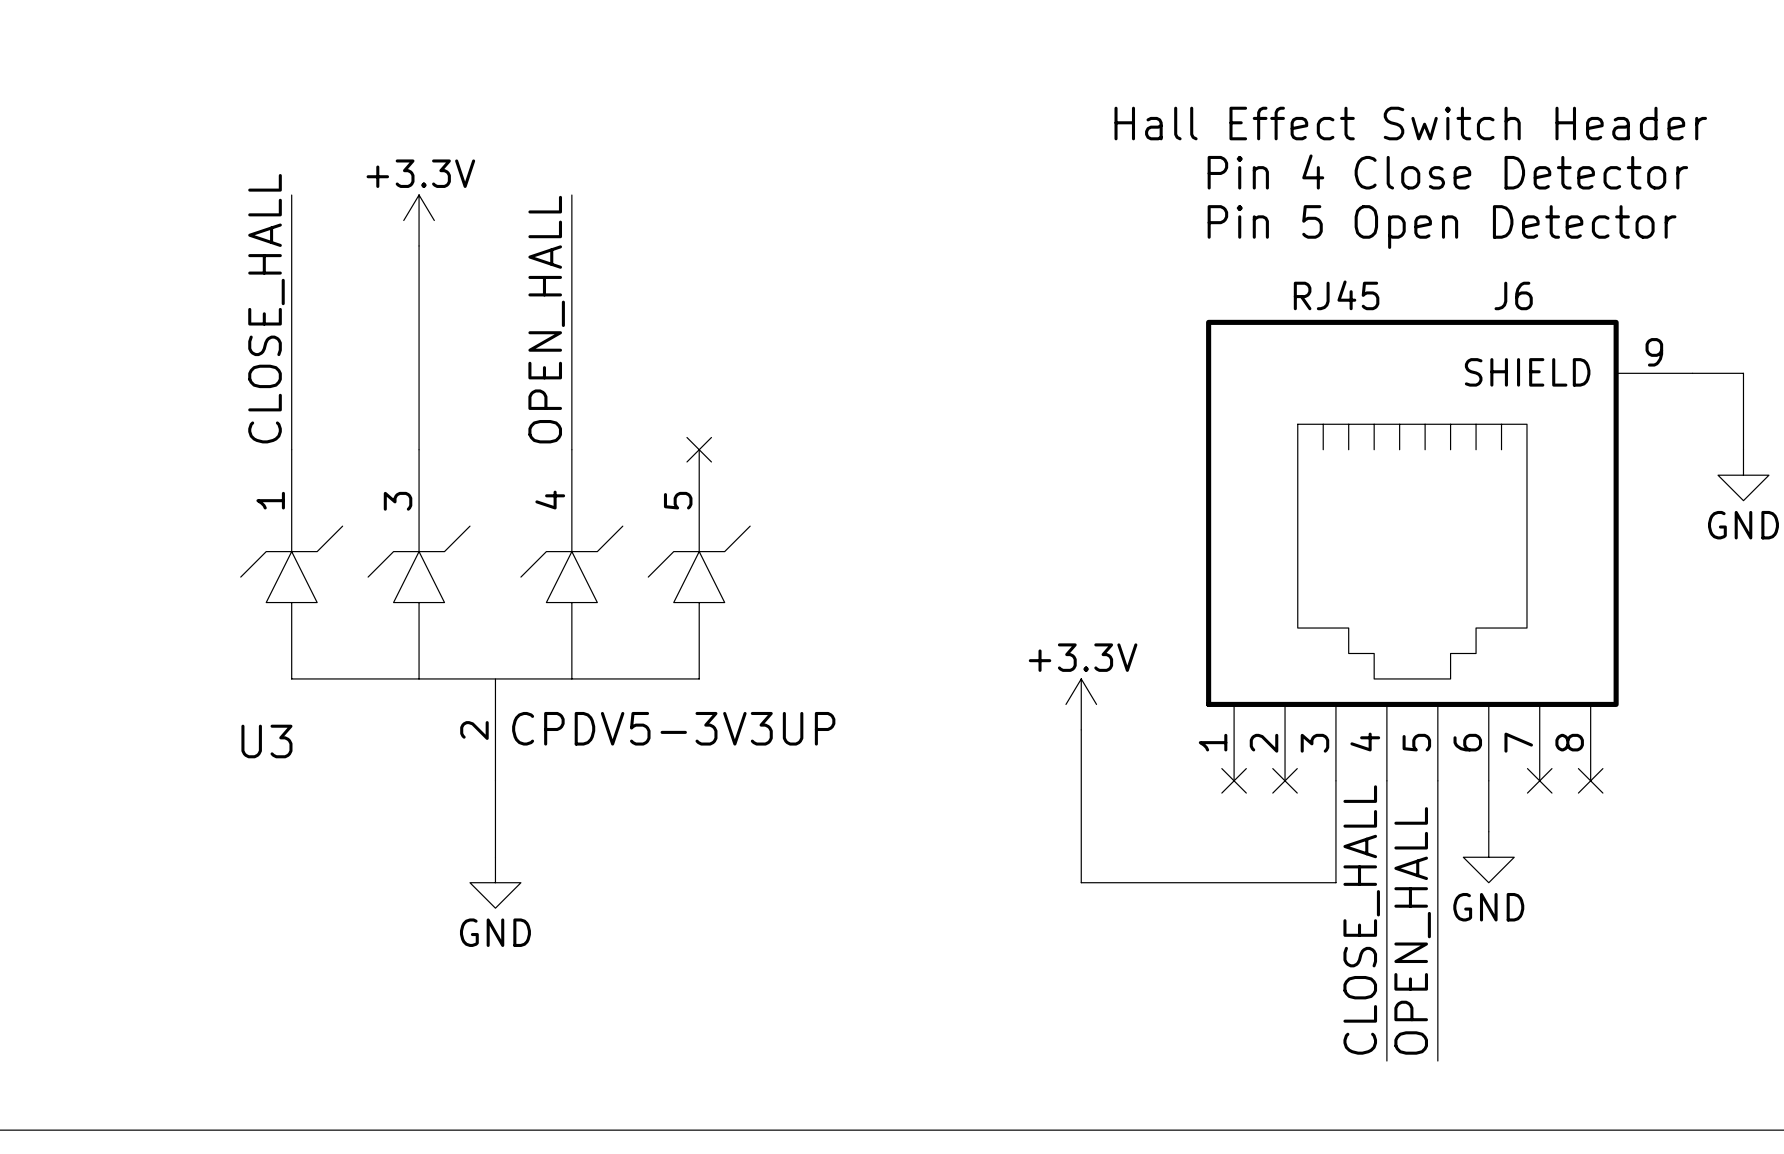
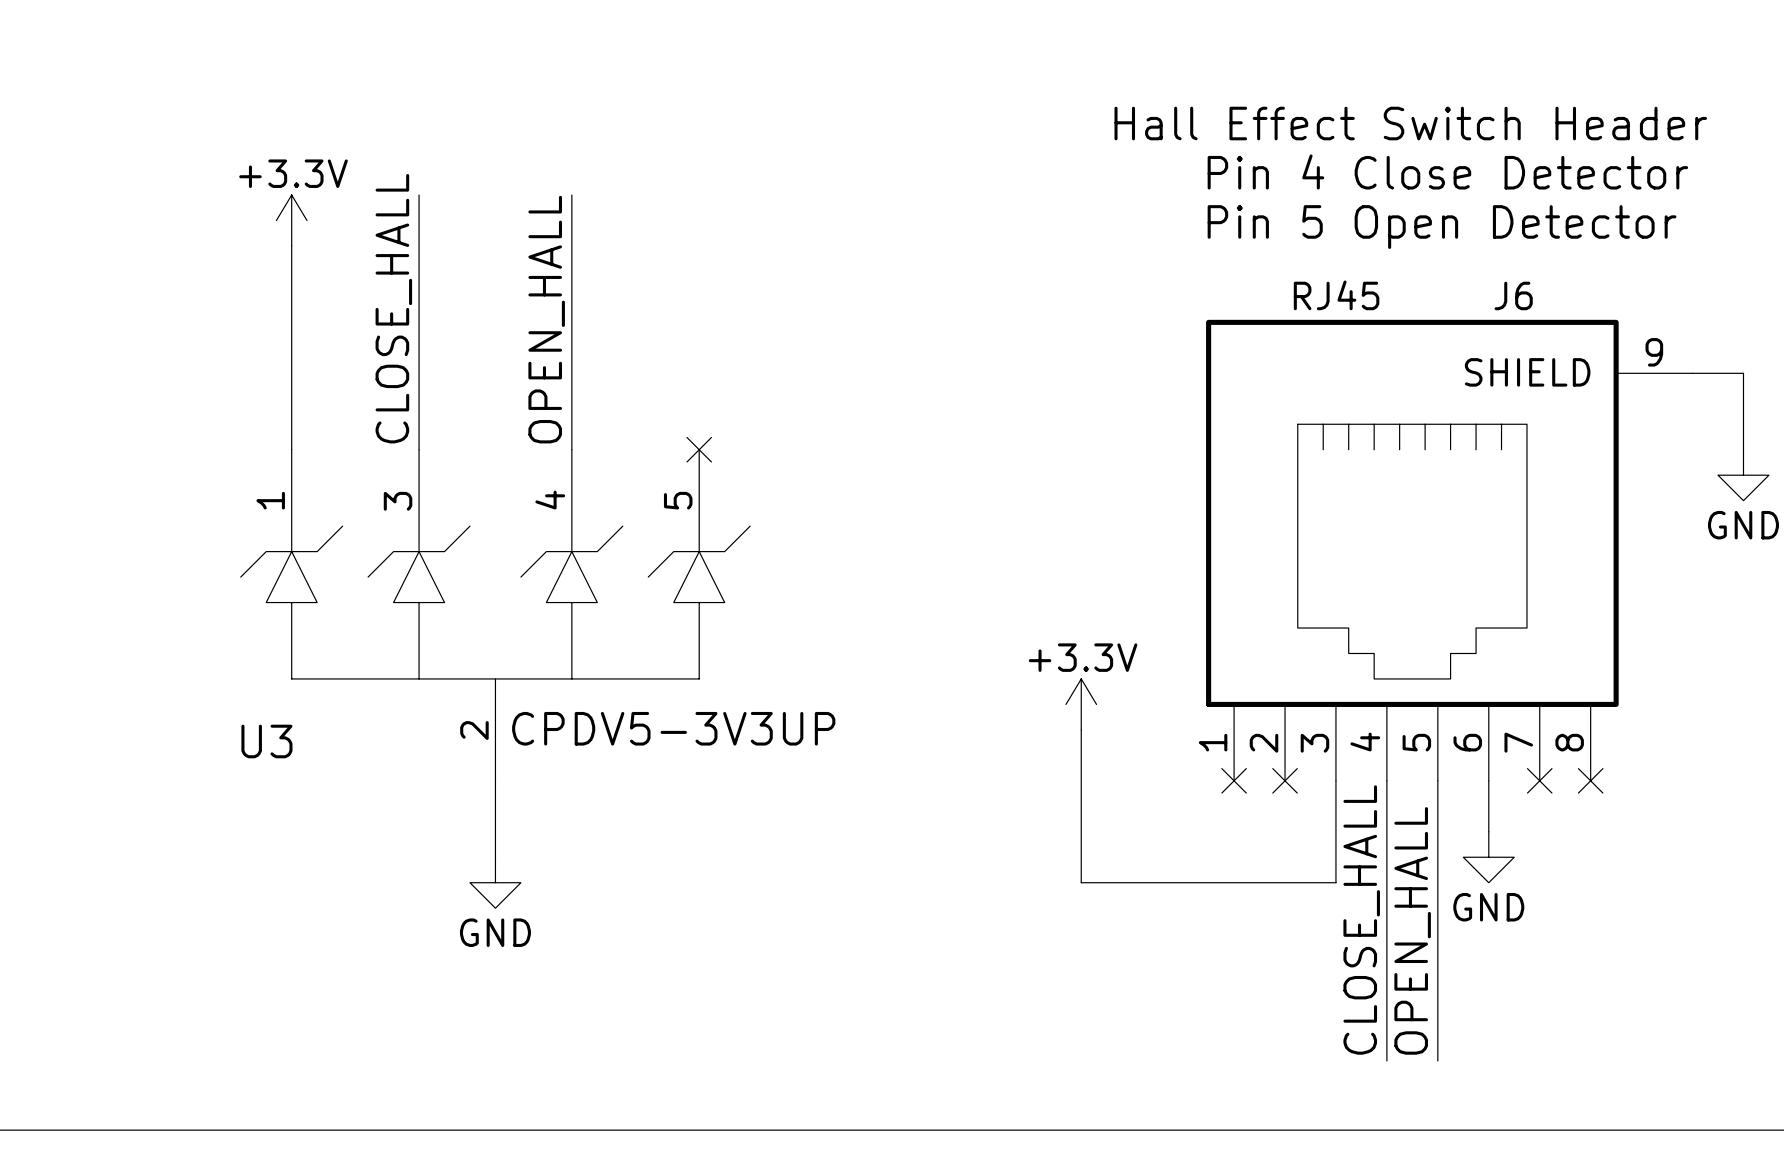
power symbol position: +3.3V (419, 220) -> +3.3V (291, 220)
label position: CLOSE_HALL (266, 308) -> CLOSE_HALL (393, 308)

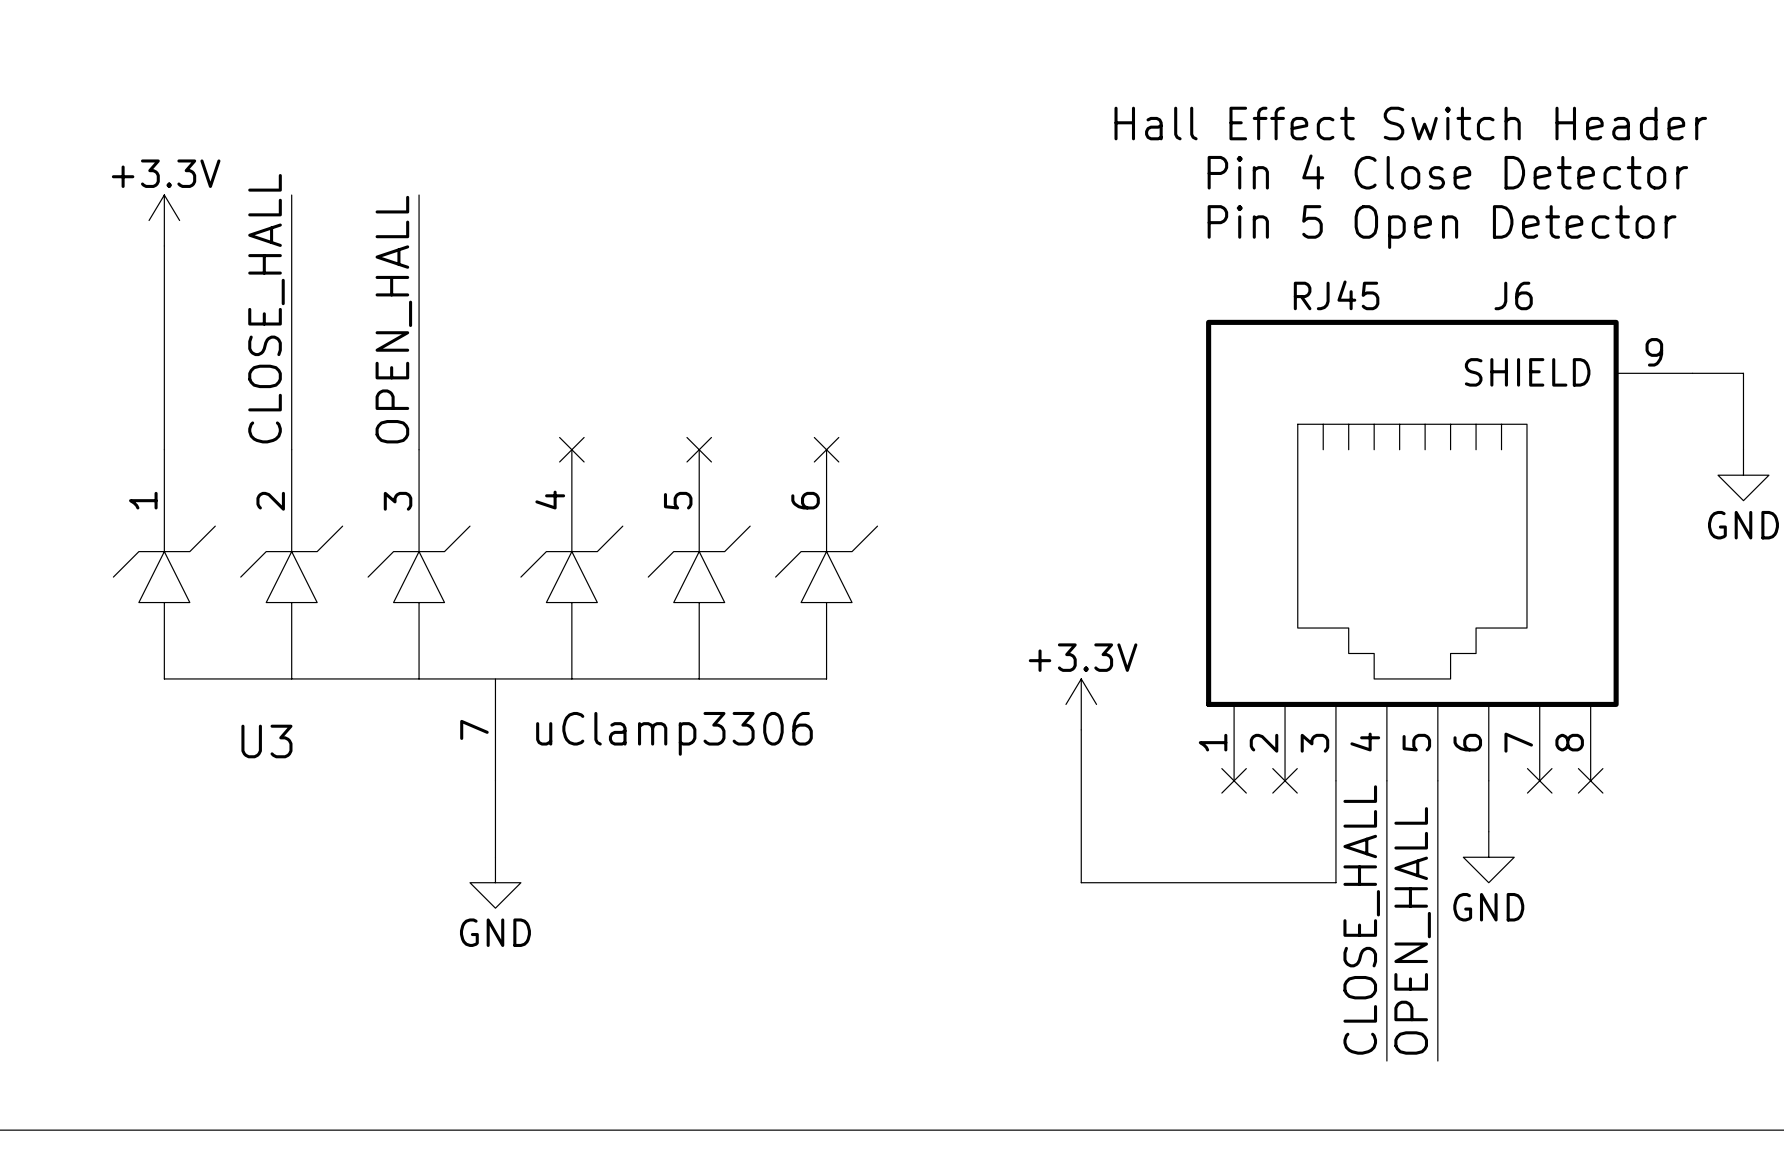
wire: (571, 195) (571, 449) -> none
power symbol position: +3.3V (291, 220) -> +3.3V (164, 220)
wire: none -> (164, 245) (164, 449)
label: none -> CLOSE_HALL (266, 308)
label: CLOSE_HALL (393, 308) -> OPEN_HALL (393, 319)
label: OPEN_HALL (546, 319) -> none
U3 symbol: [240, 449, 751, 781] -> [113, 449, 878, 781]
no-connect mark: none -> (571, 449)
no-connect mark: none -> (826, 449)
U3 value: CPDV5-3V3UP (673, 728) -> uClamp3306 (674, 733)

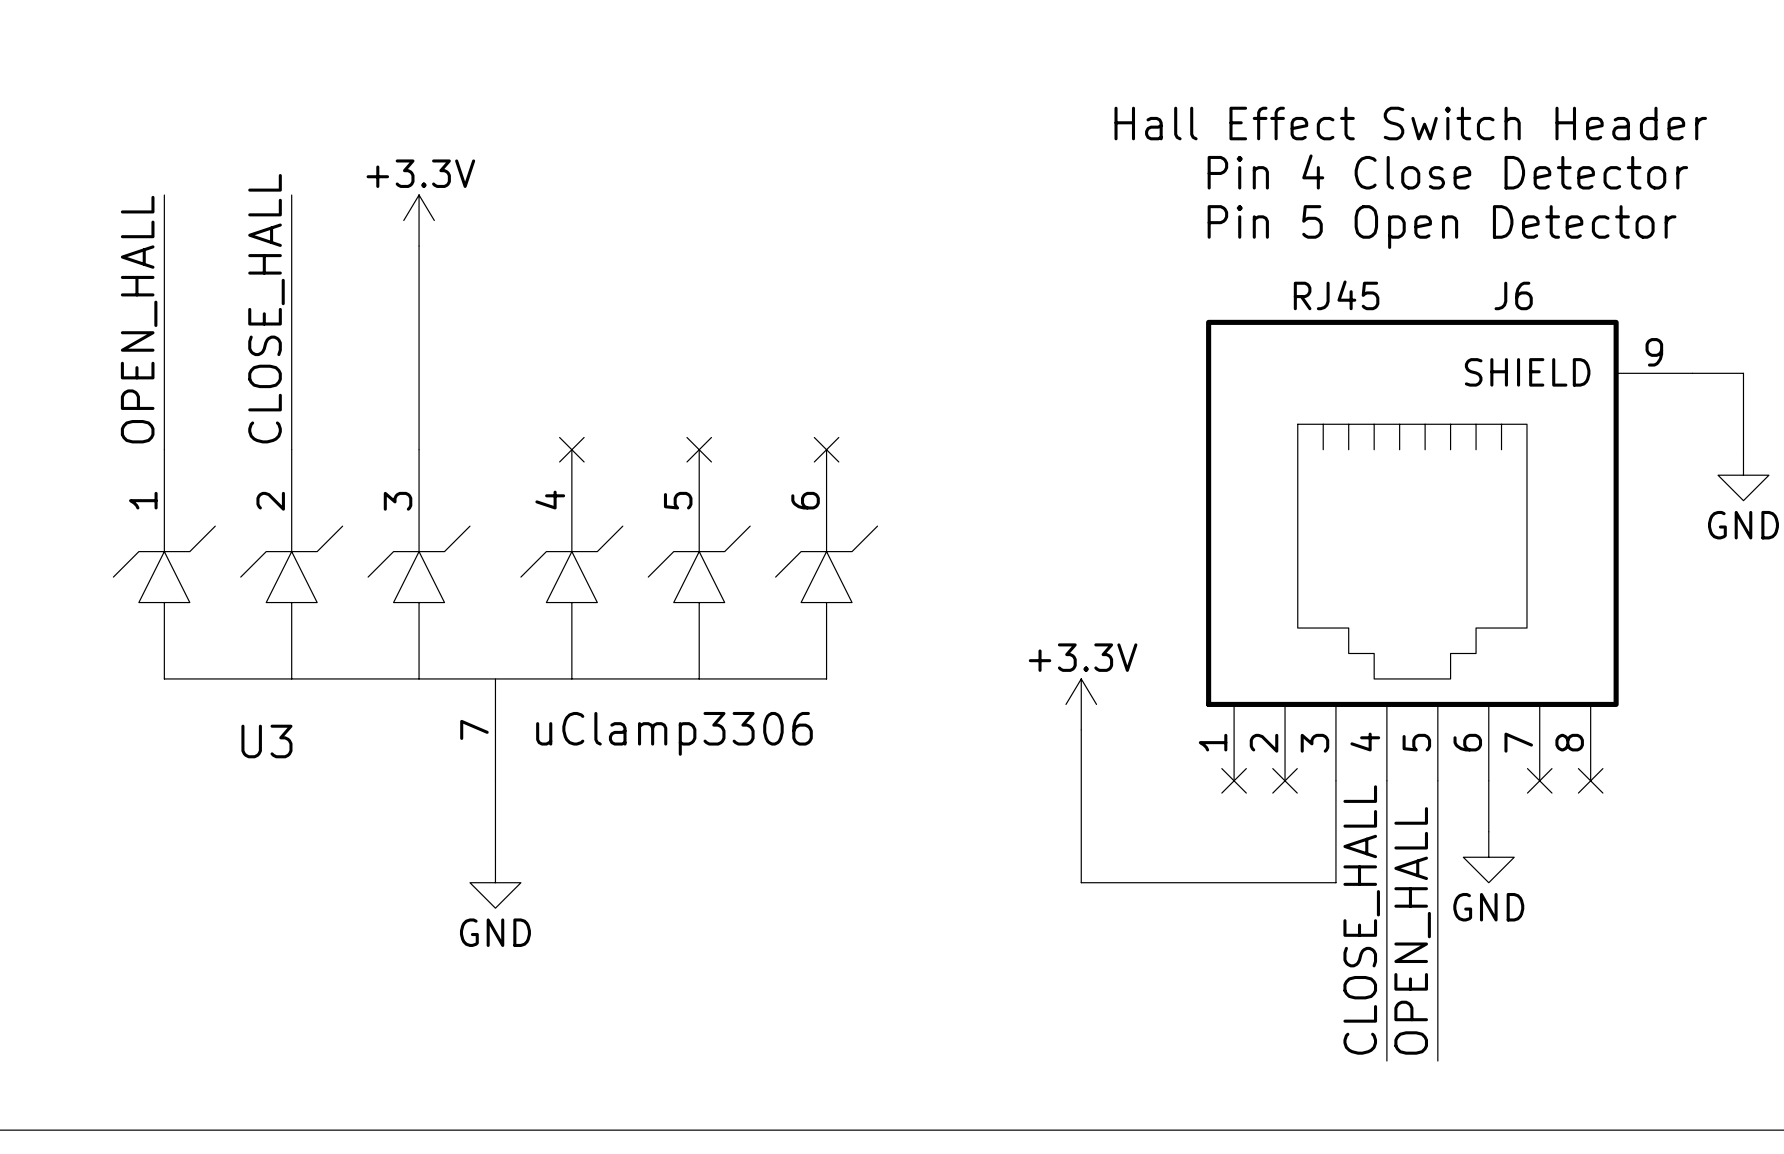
power symbol position: +3.3V (164, 220) -> +3.3V (419, 220)
label position: OPEN_HALL (393, 319) -> OPEN_HALL (139, 319)

